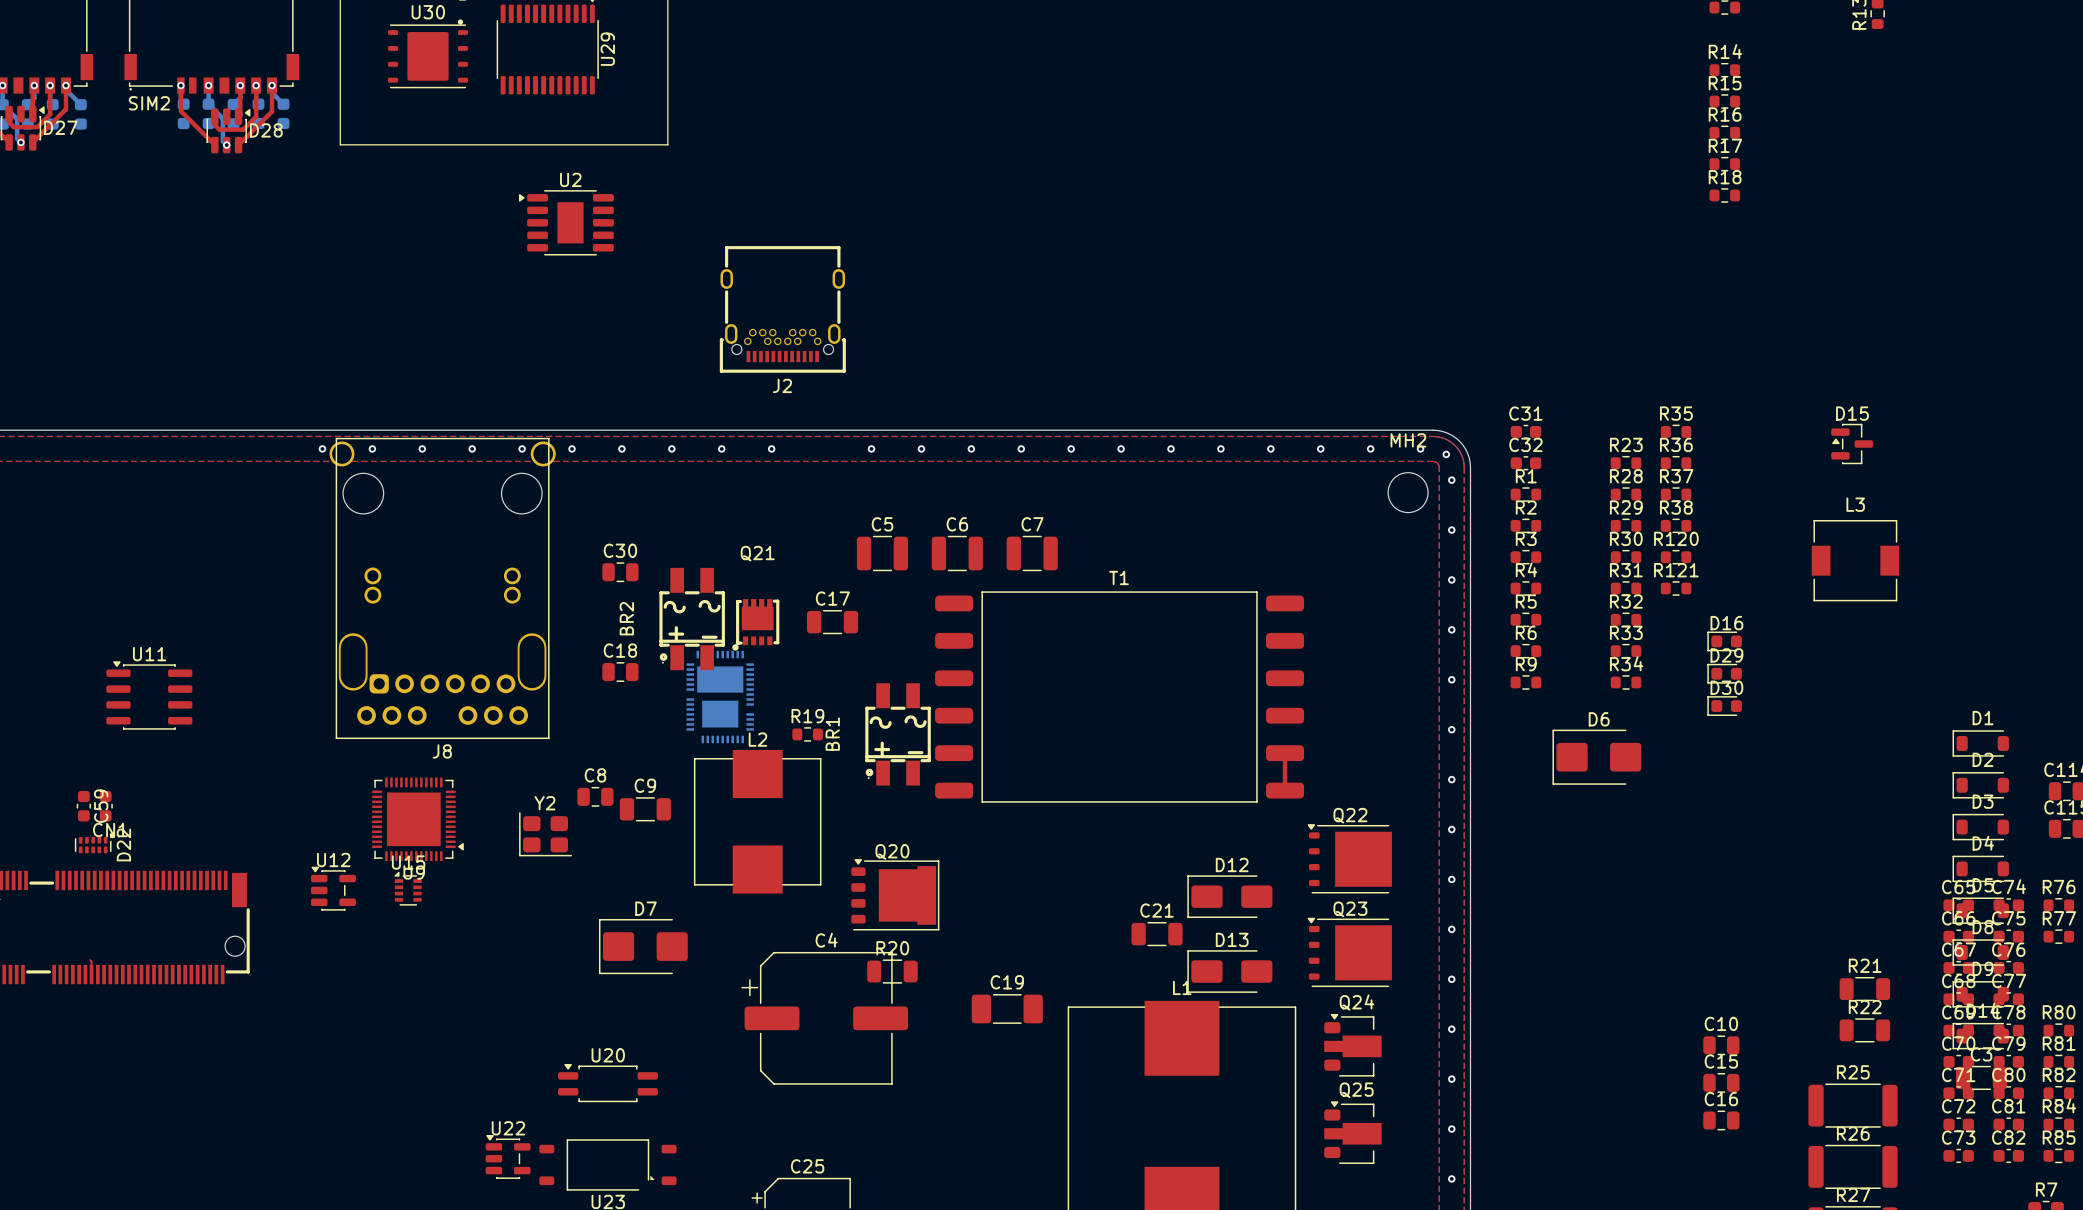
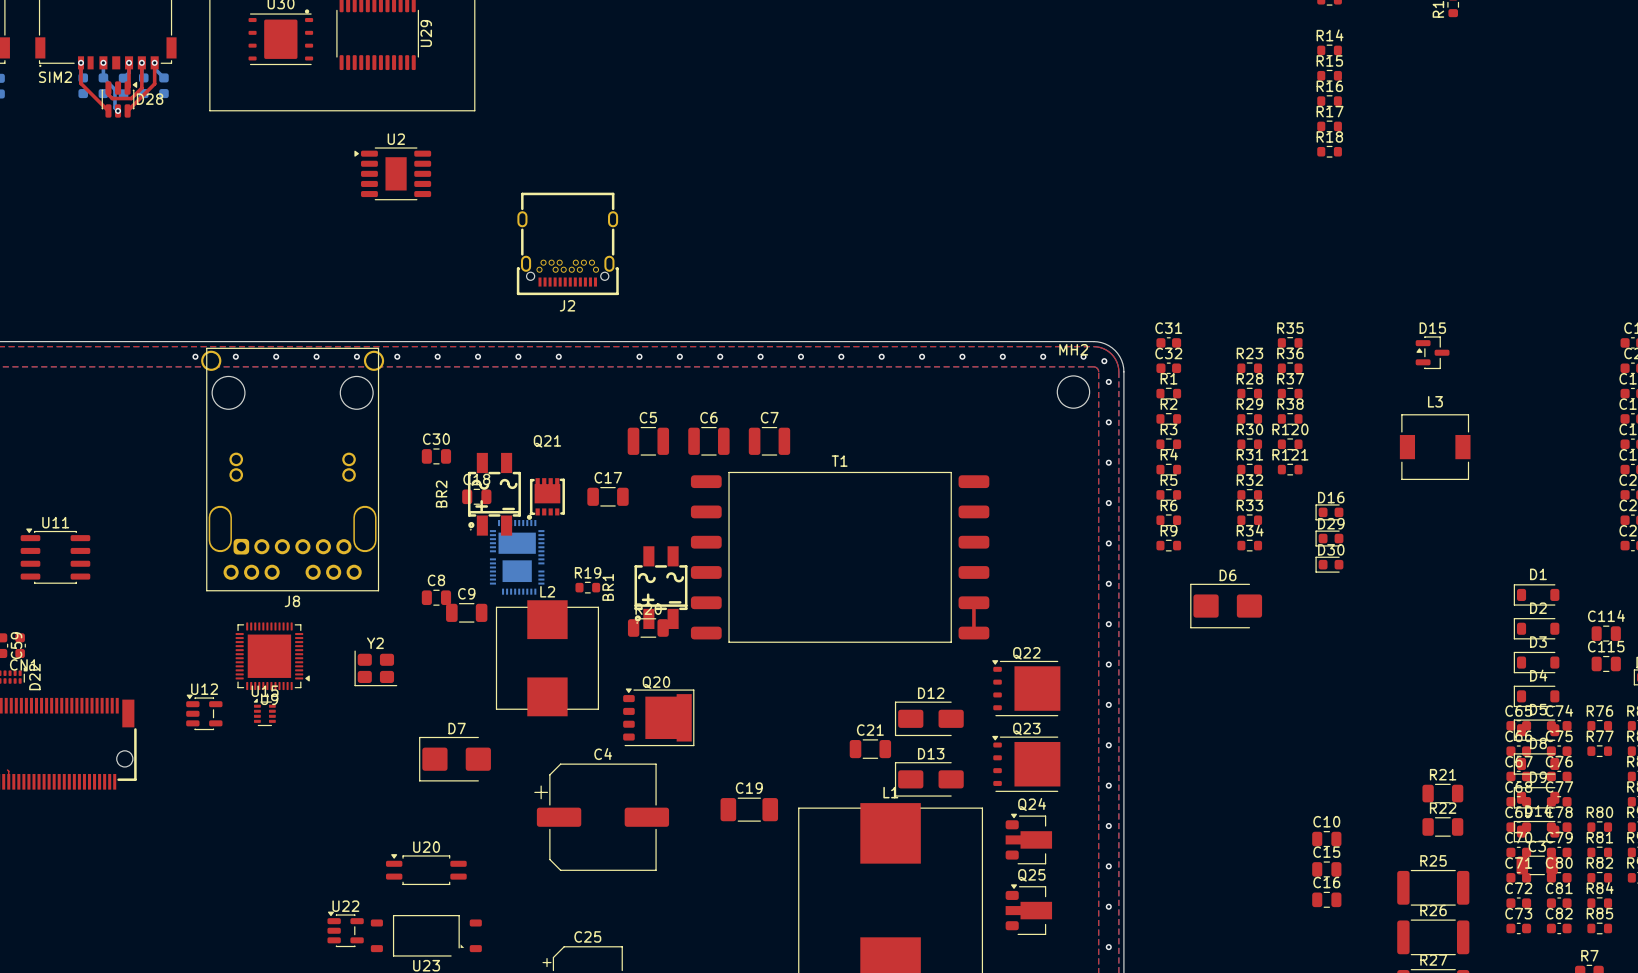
C18 position: (620, 672) -> (476, 496)
C8 position: (595, 796) -> (436, 597)
C9 position: (645, 809) -> (466, 612)
R20 position: (892, 971) -> (648, 627)

